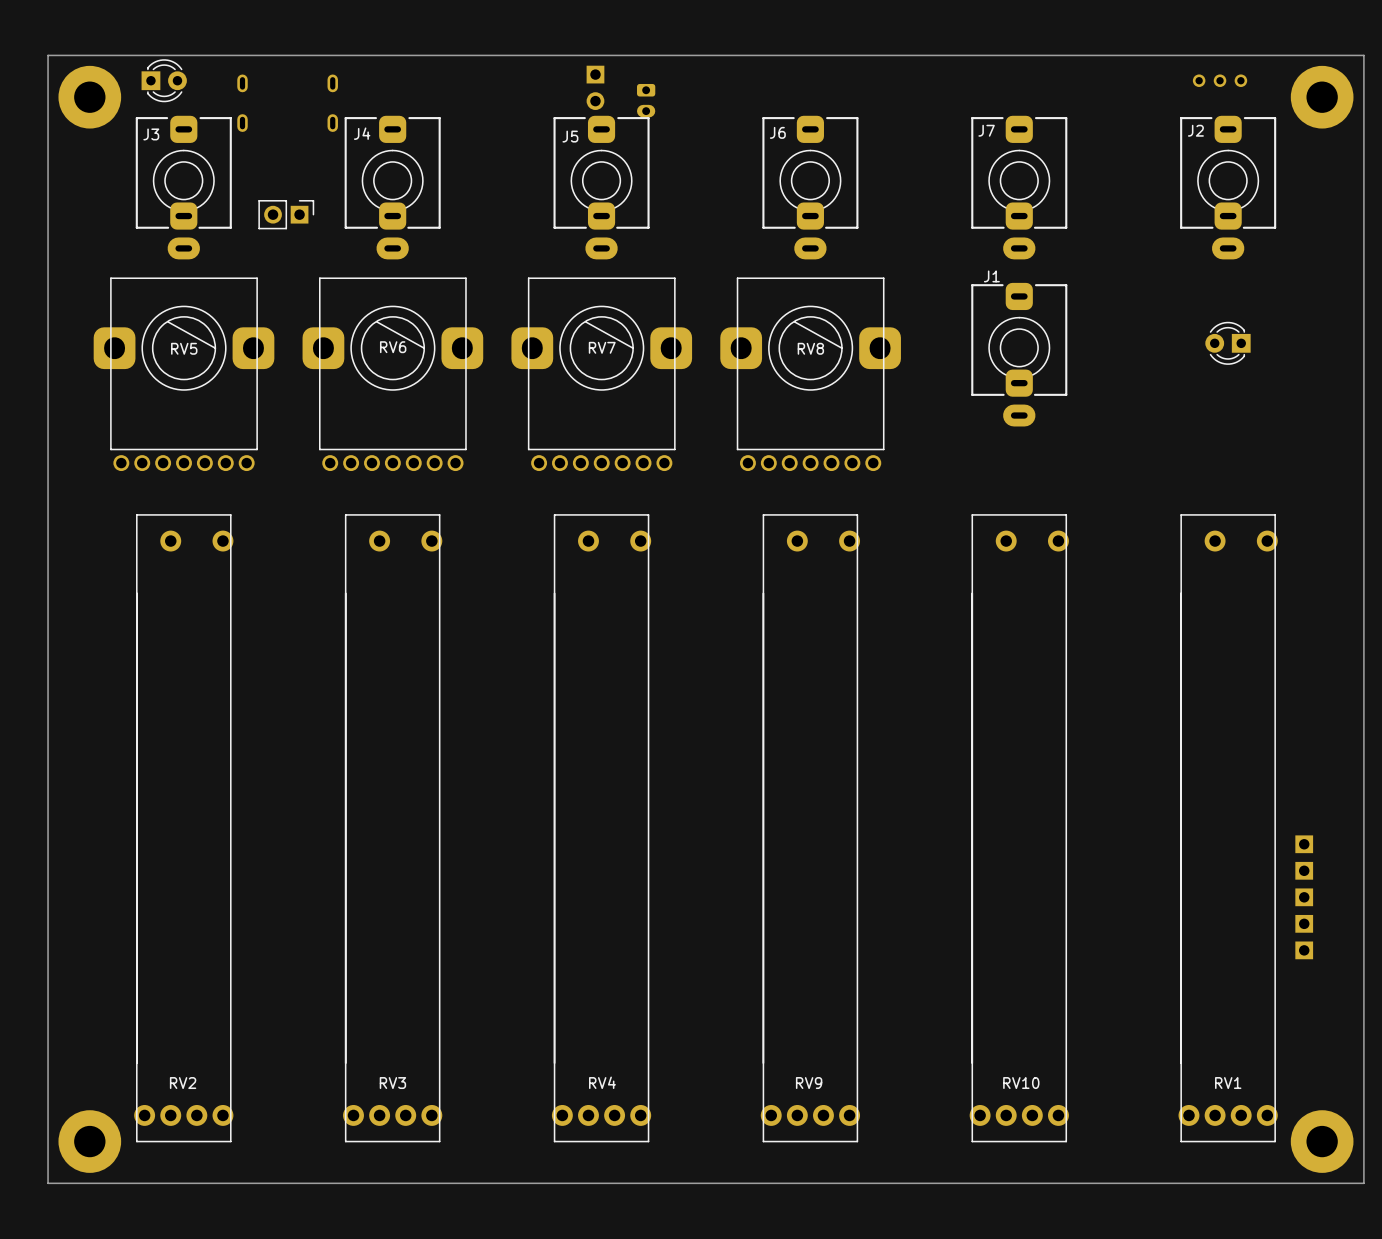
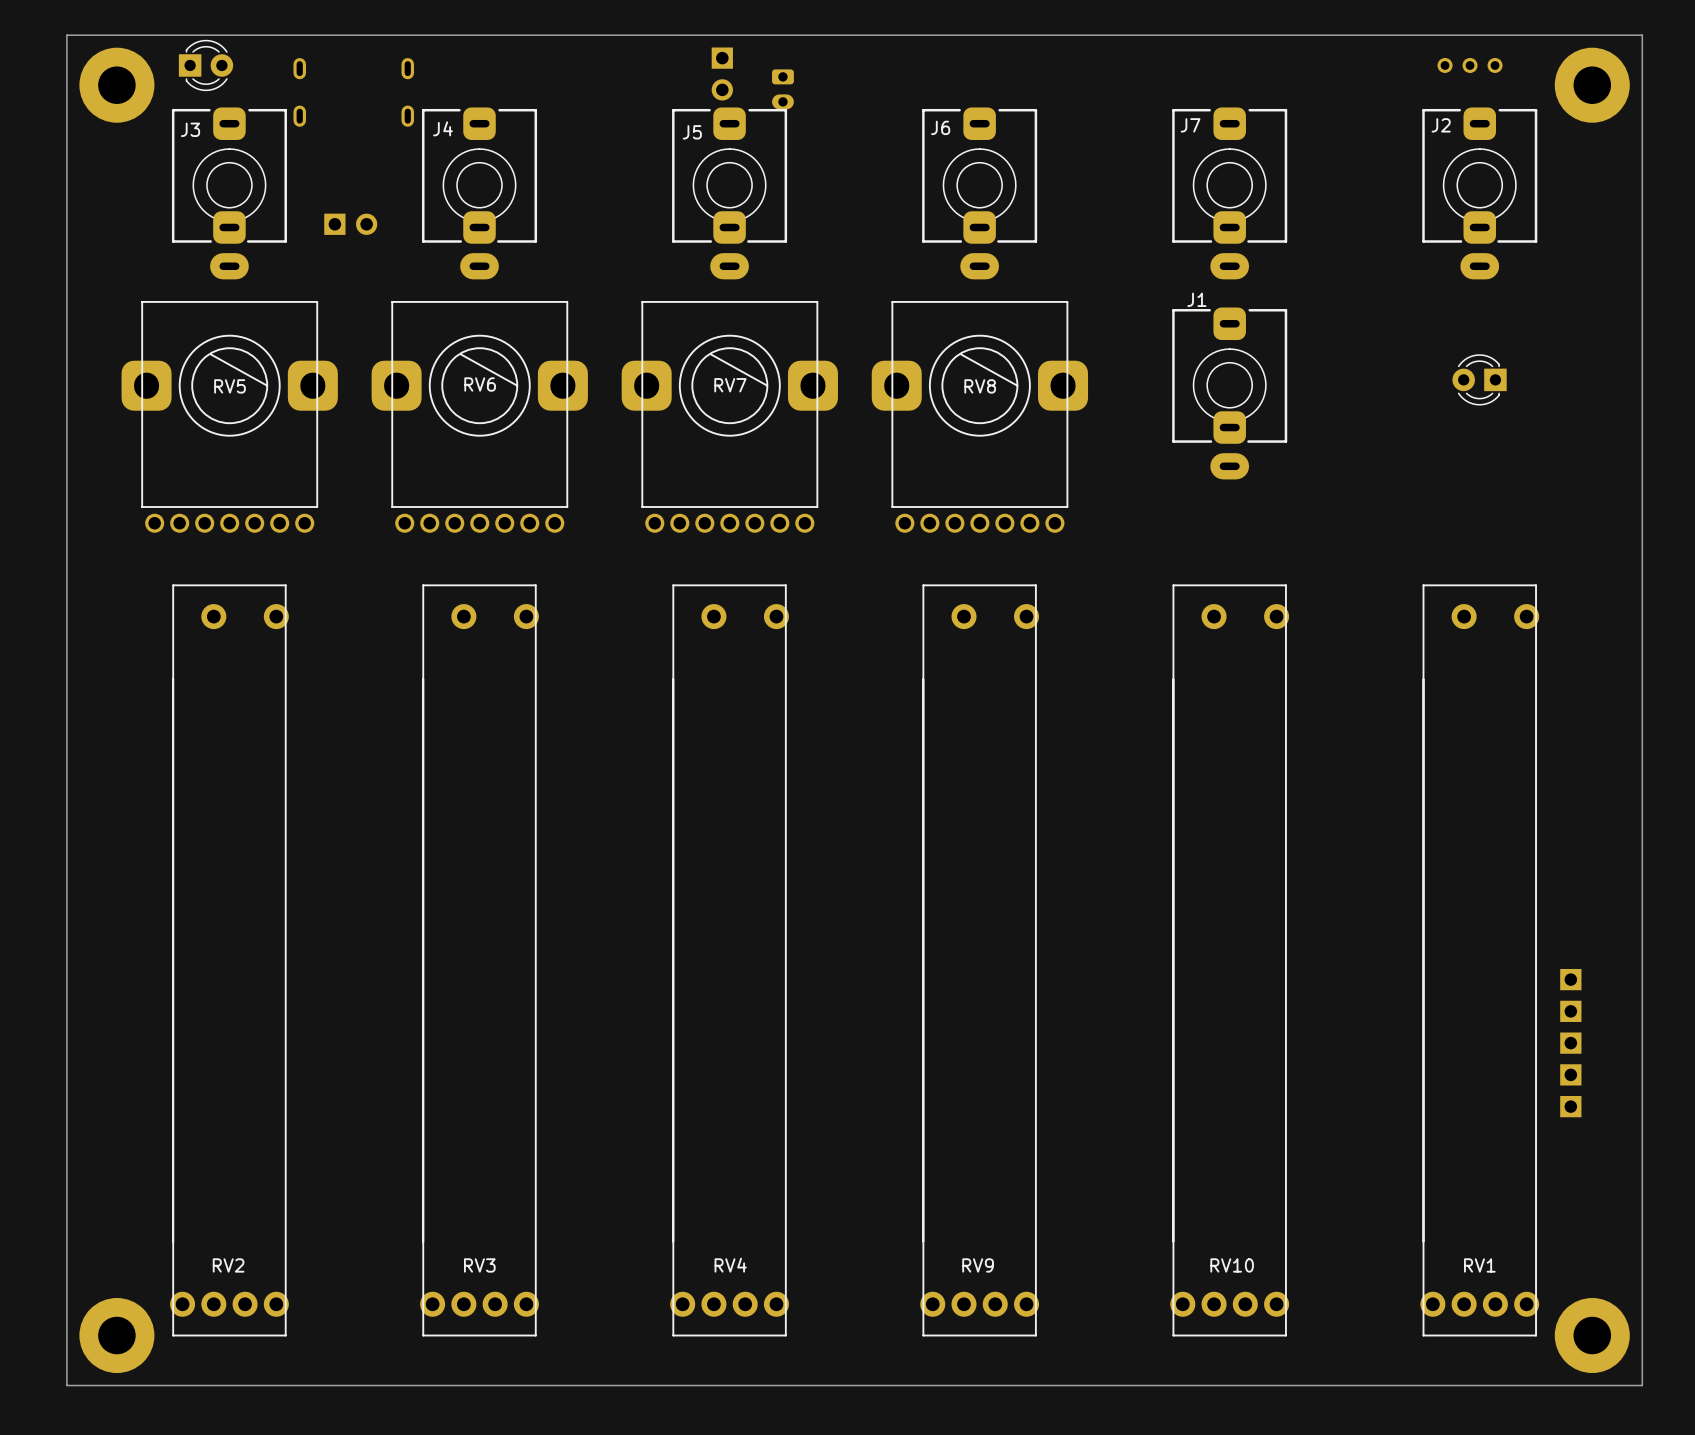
part side: top (286, 214) -> bottom (350, 224)

